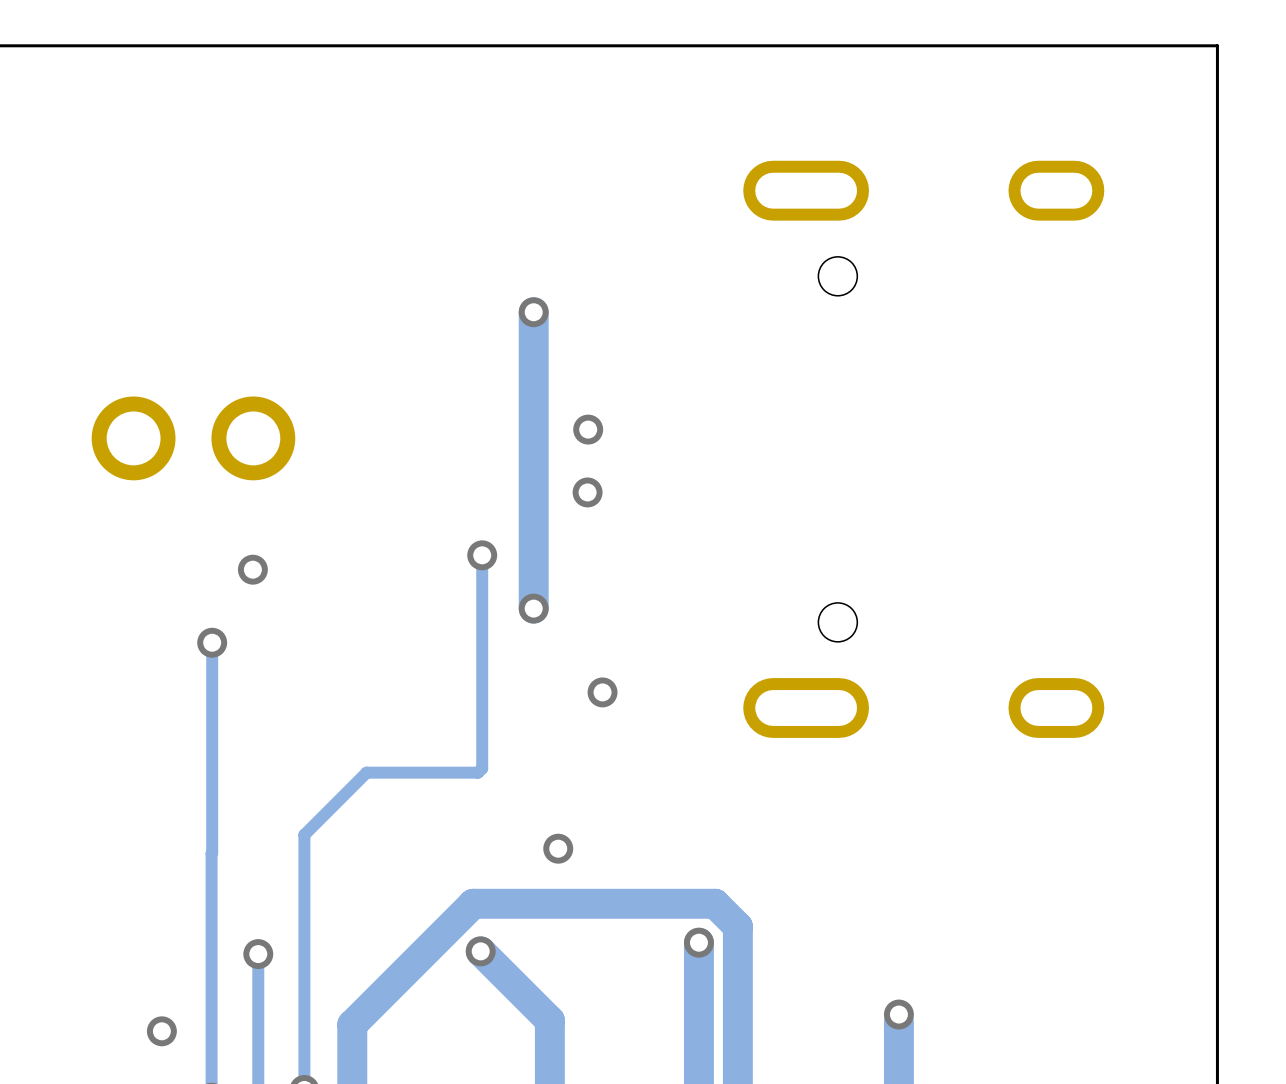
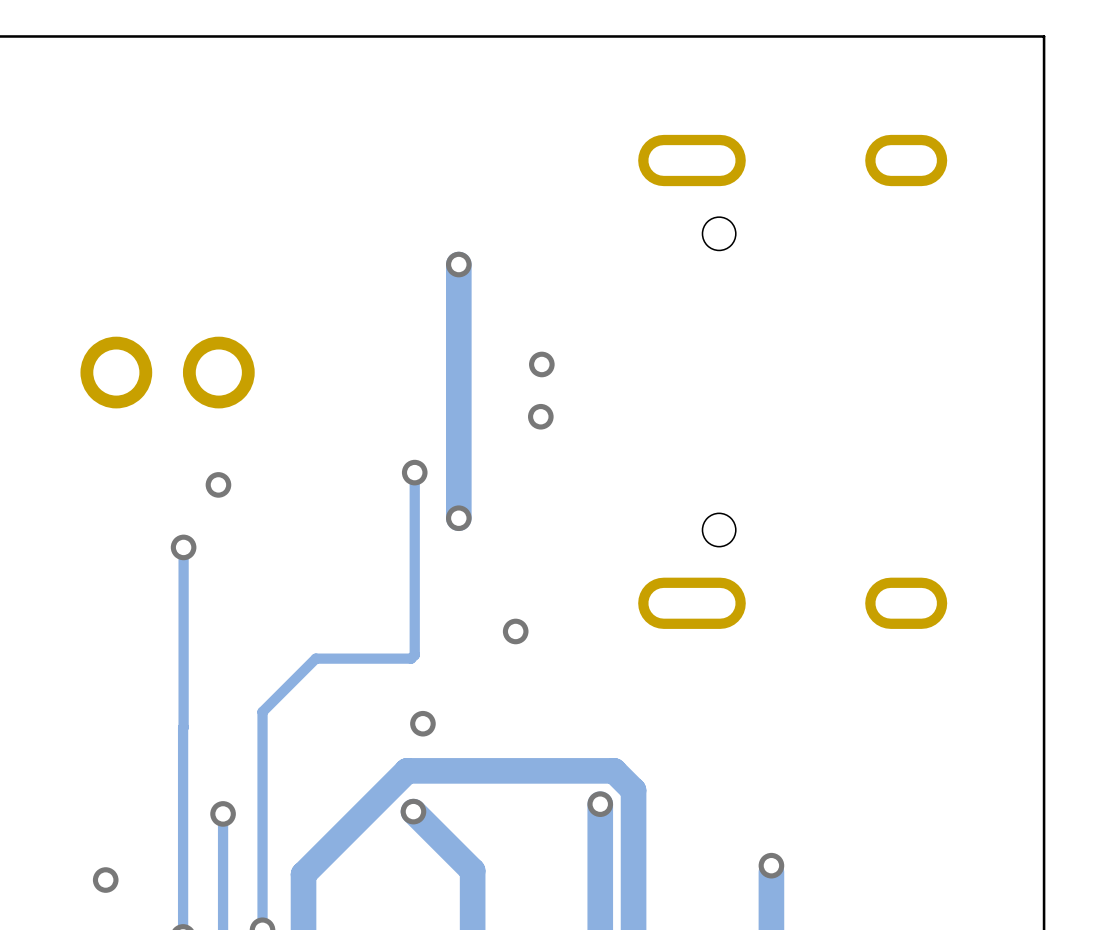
via: none -> (541, 364)
via: (588, 429) -> none
via: none -> (540, 416)
via: (587, 492) -> none
via position: (602, 692) -> (515, 631)
via: none -> (422, 723)
via: (558, 848) -> none
via position: (161, 1031) -> (105, 880)

